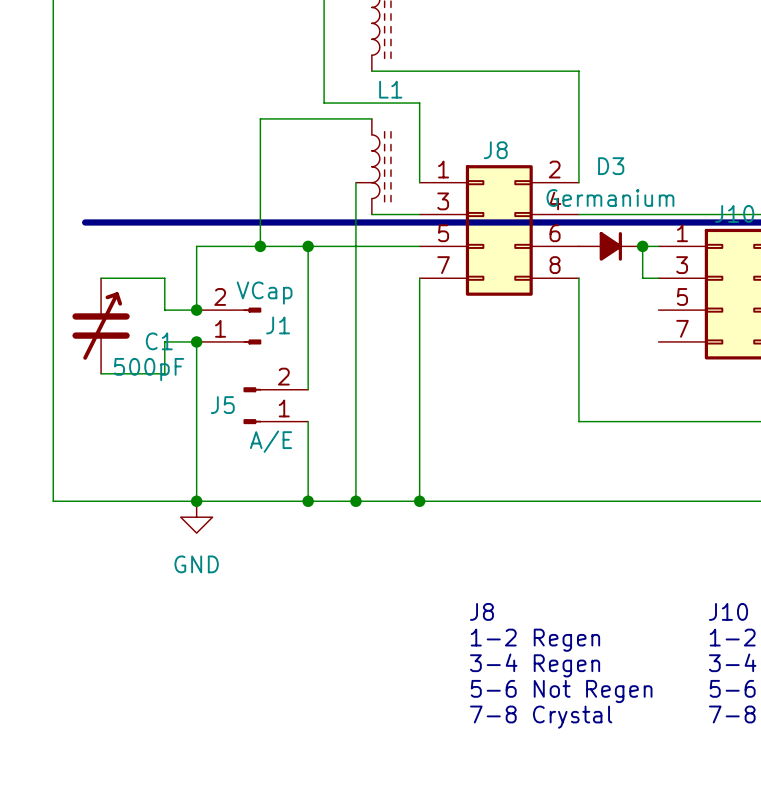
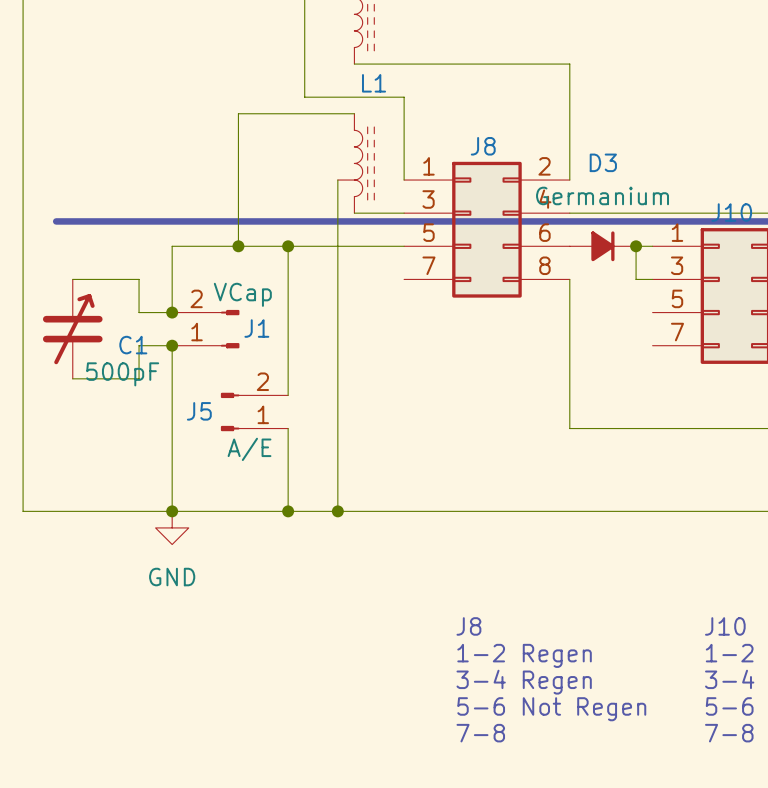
wire: (419, 278) (419, 501) -> none
junction: (419, 501) -> none
text: 7-8 Crystal (541, 717) -> 7-8 (480, 733)

